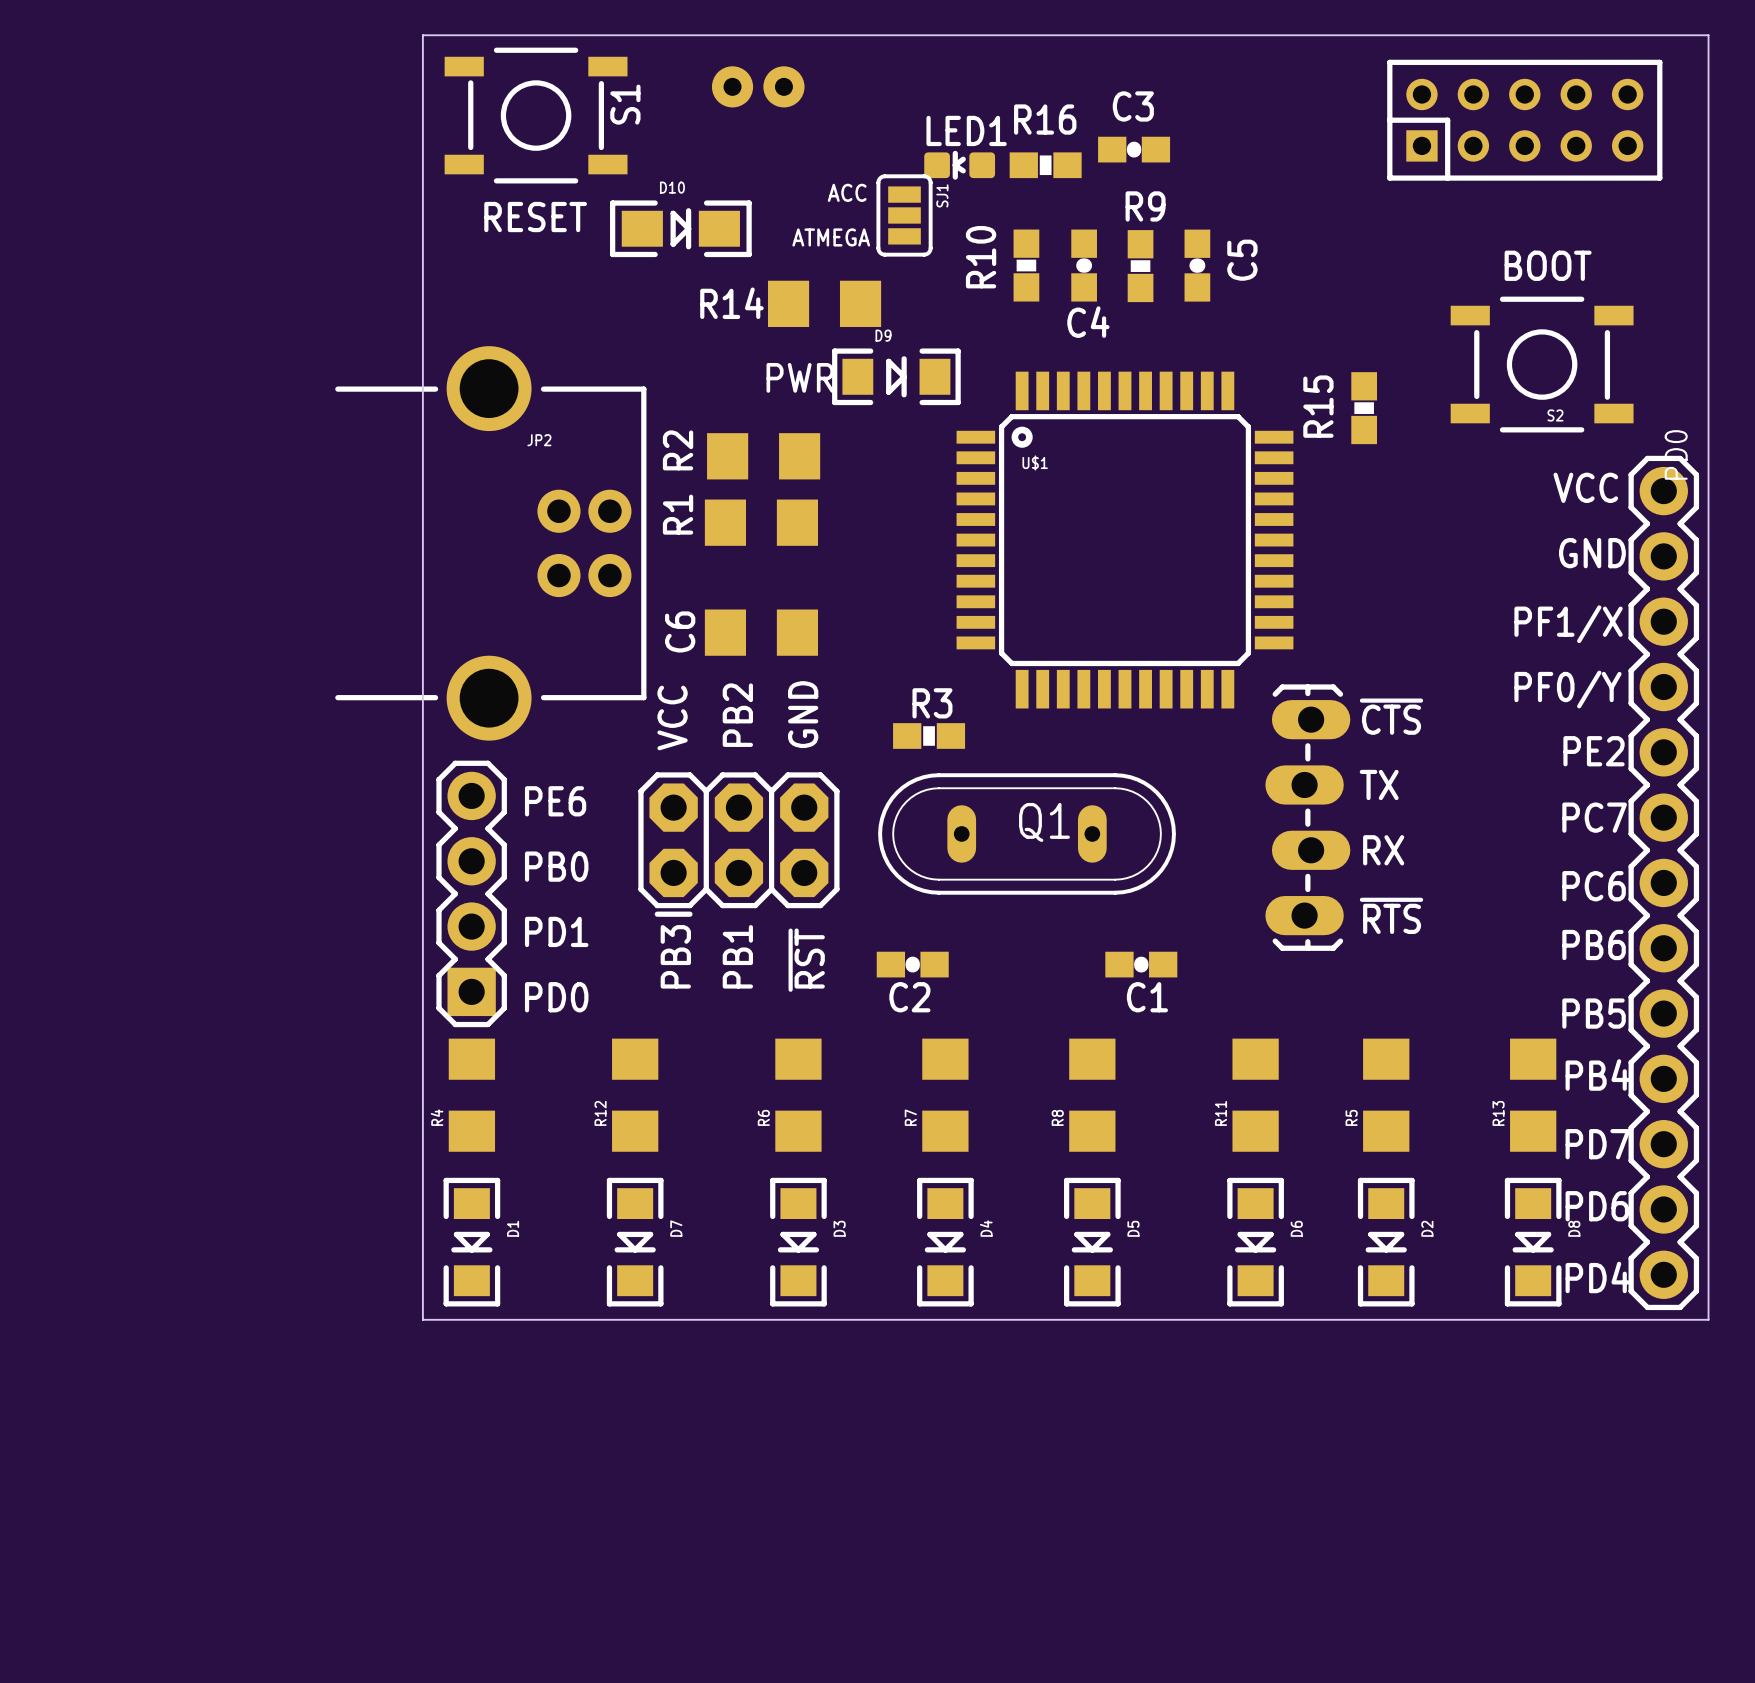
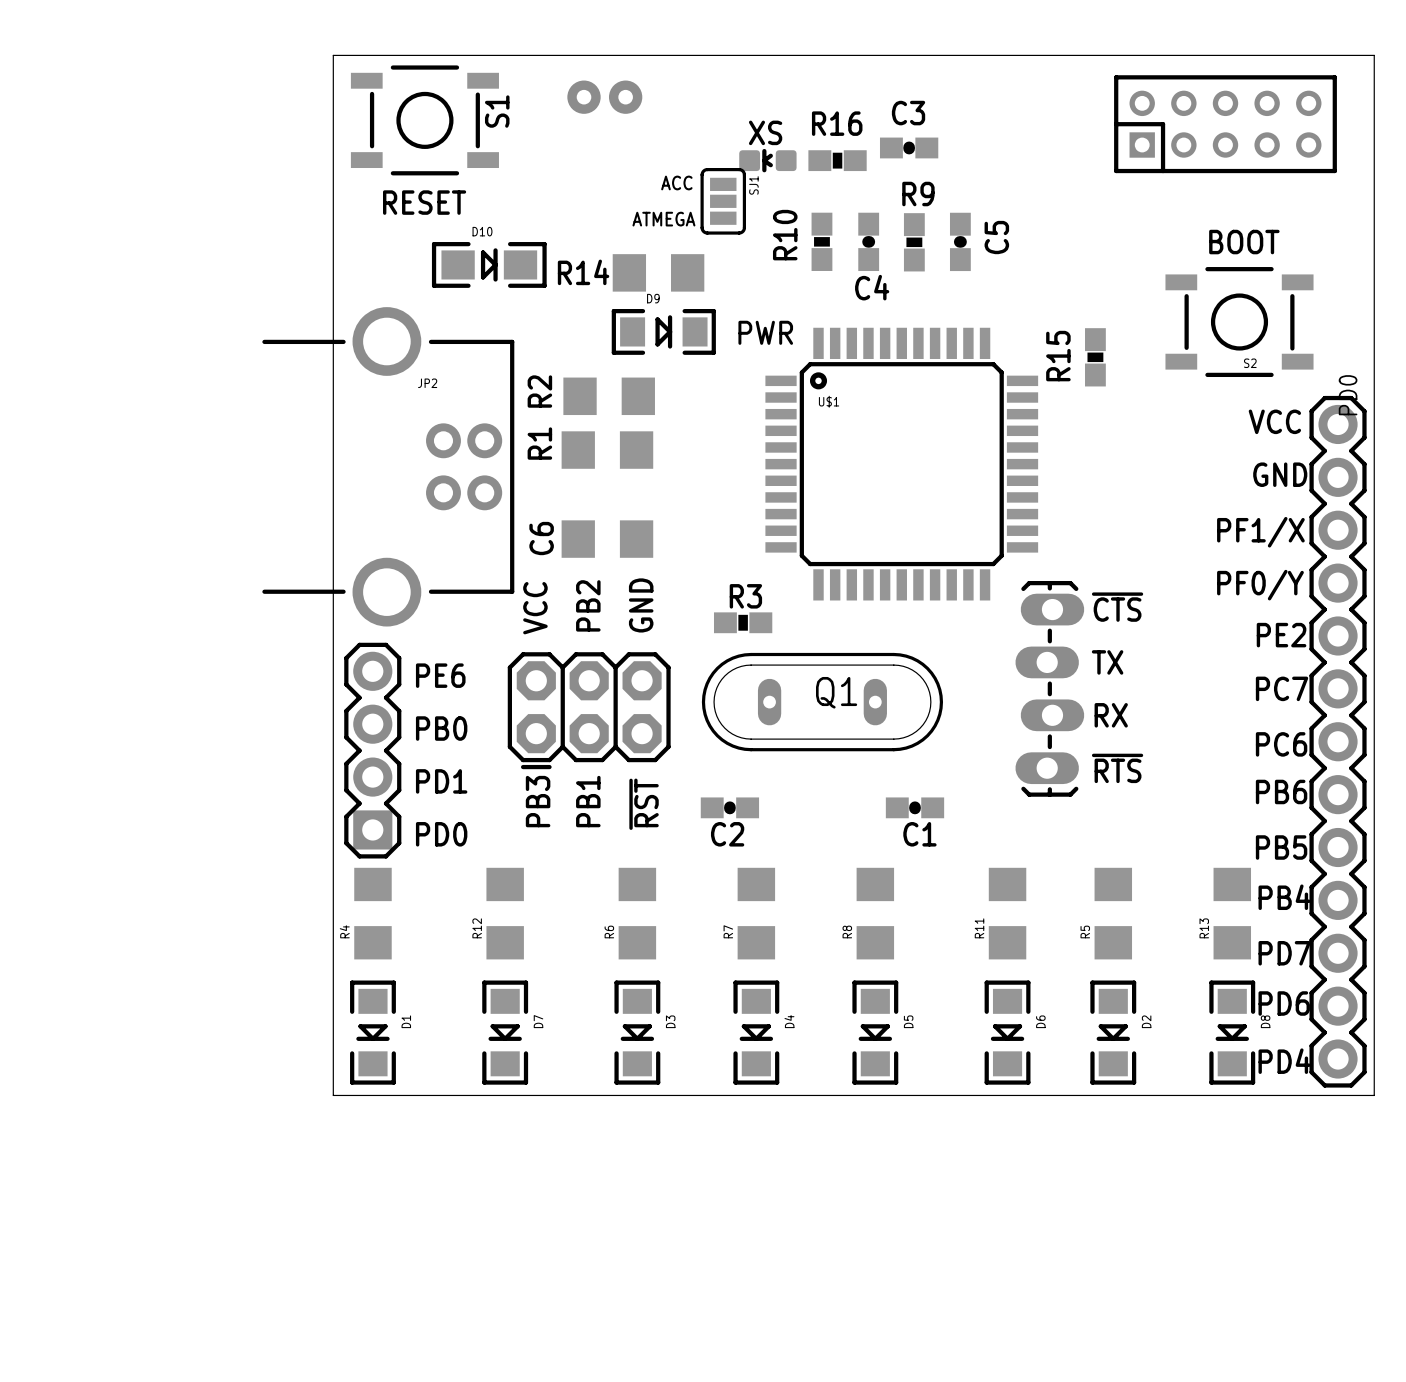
LED1 name: LED1 (966, 130) -> XS (765, 132)
D10 position: (680, 228) -> (489, 264)
D9 position: (896, 376) -> (663, 331)
text position: PWR (800, 377) -> PWR (765, 332)

